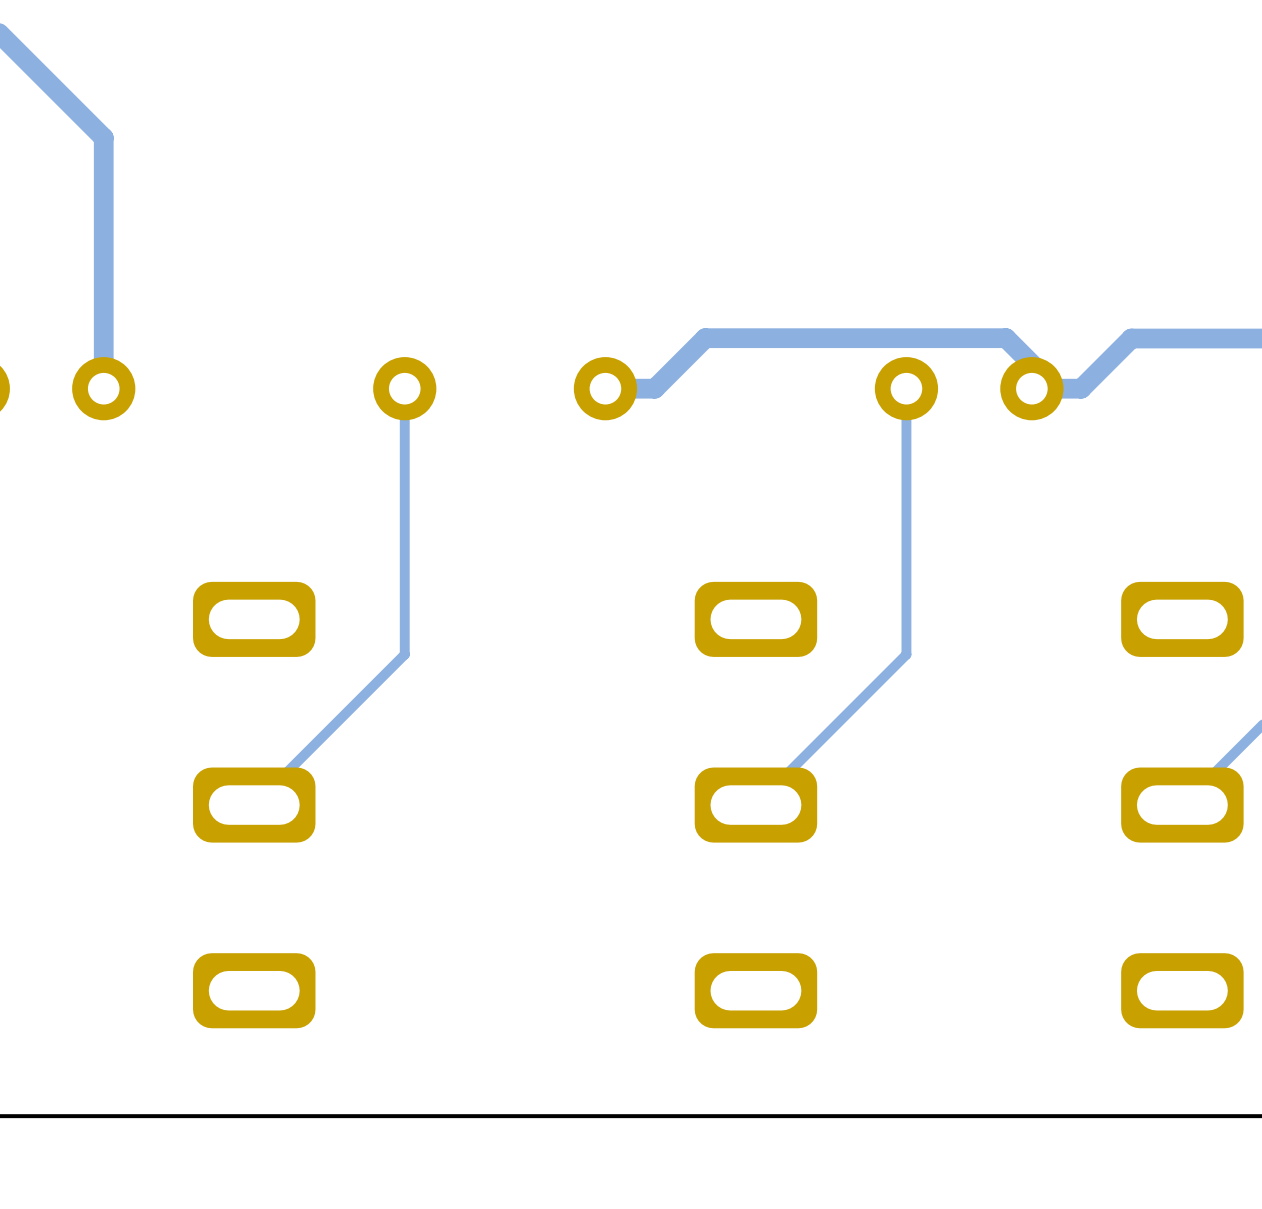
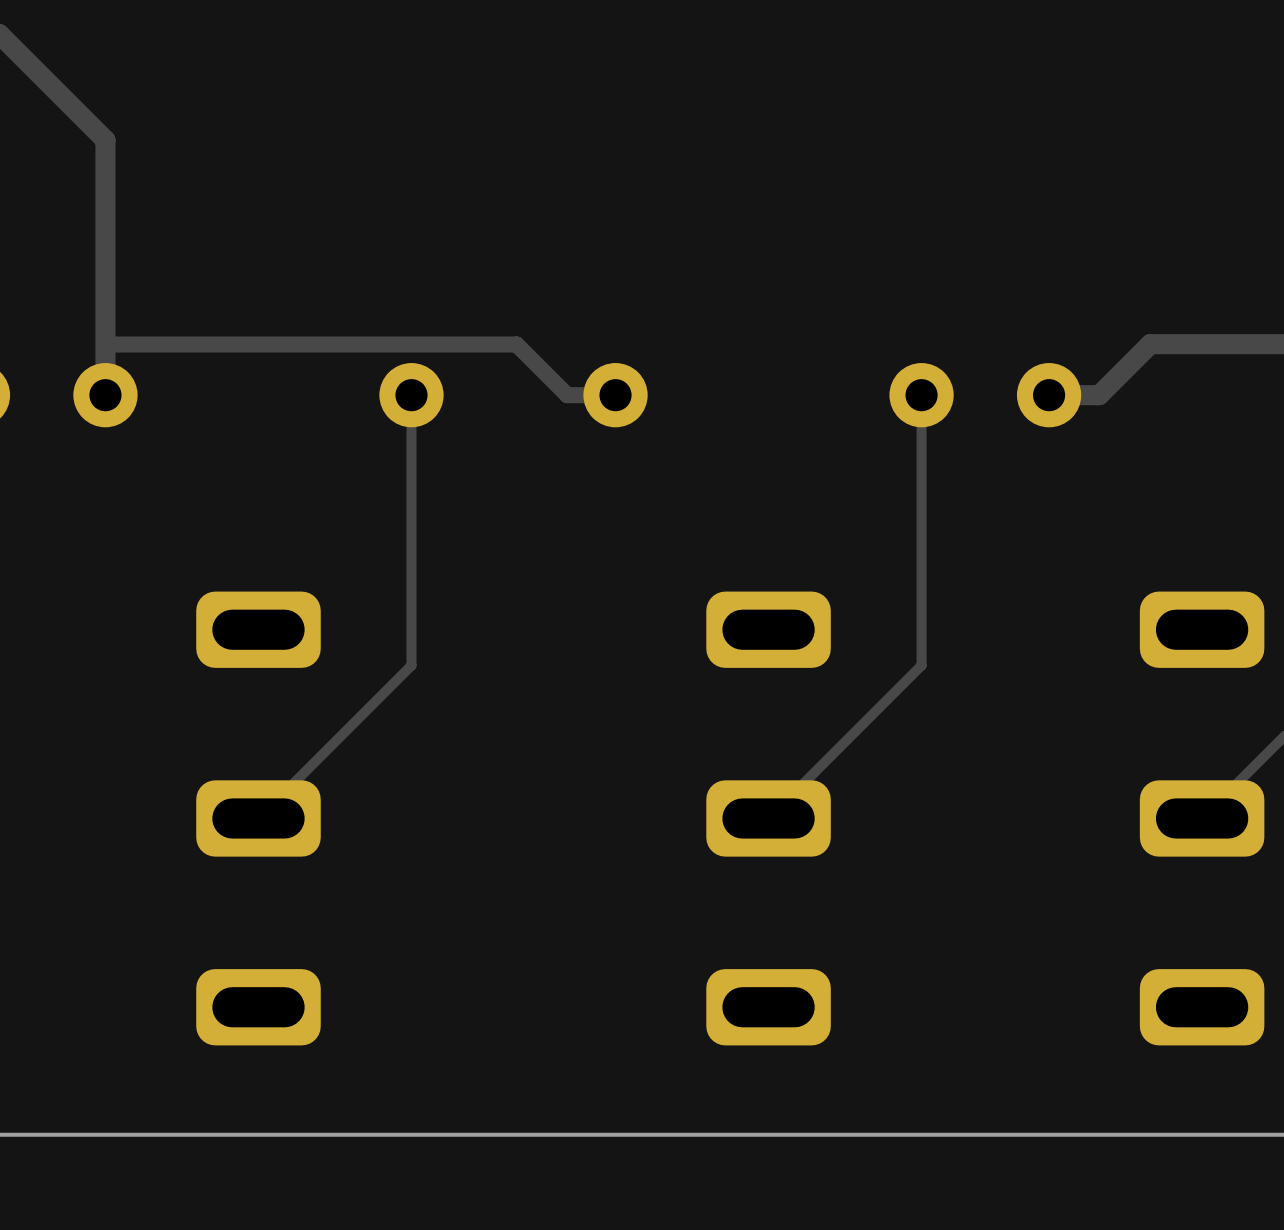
track: (1056, 388) (1006, 338) (705, 338) (654, 388) (605, 388) -> (105, 344) (516, 344) (567, 395) (615, 395)

